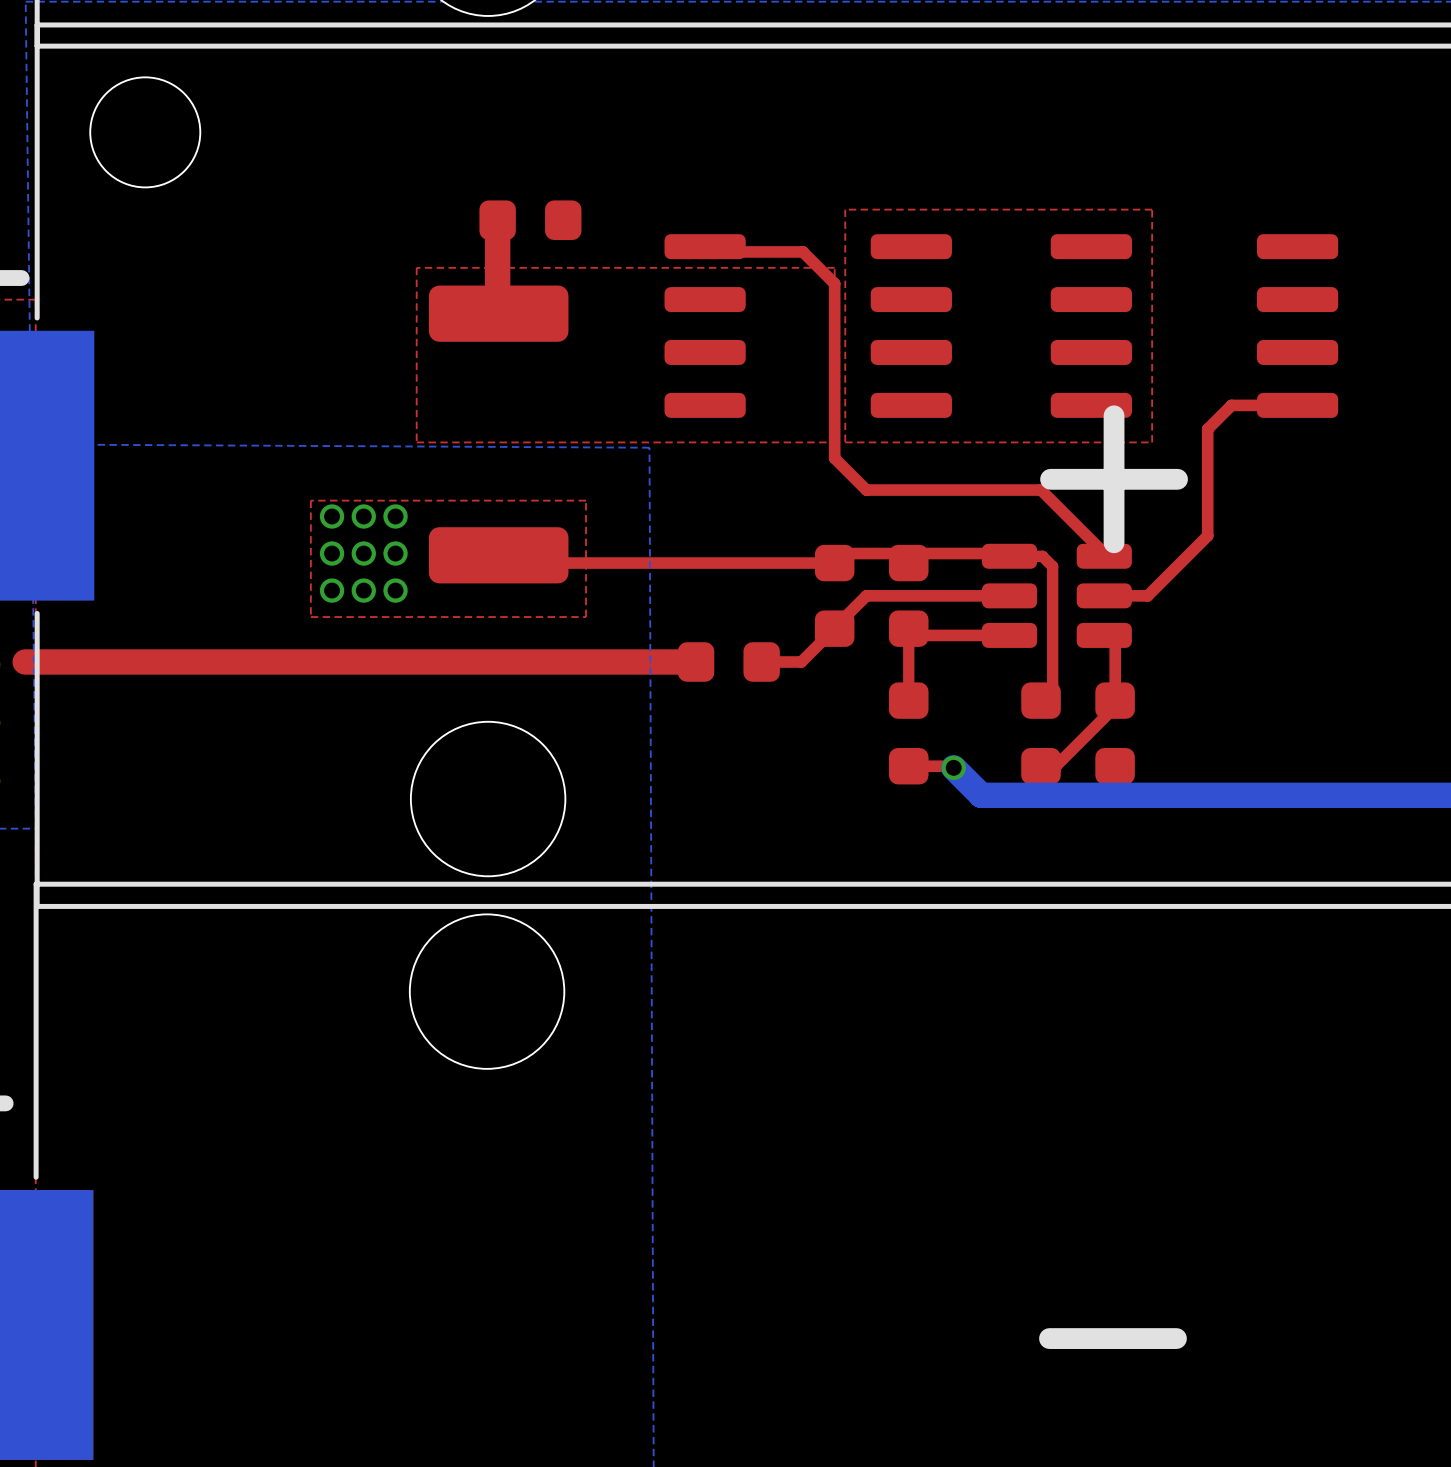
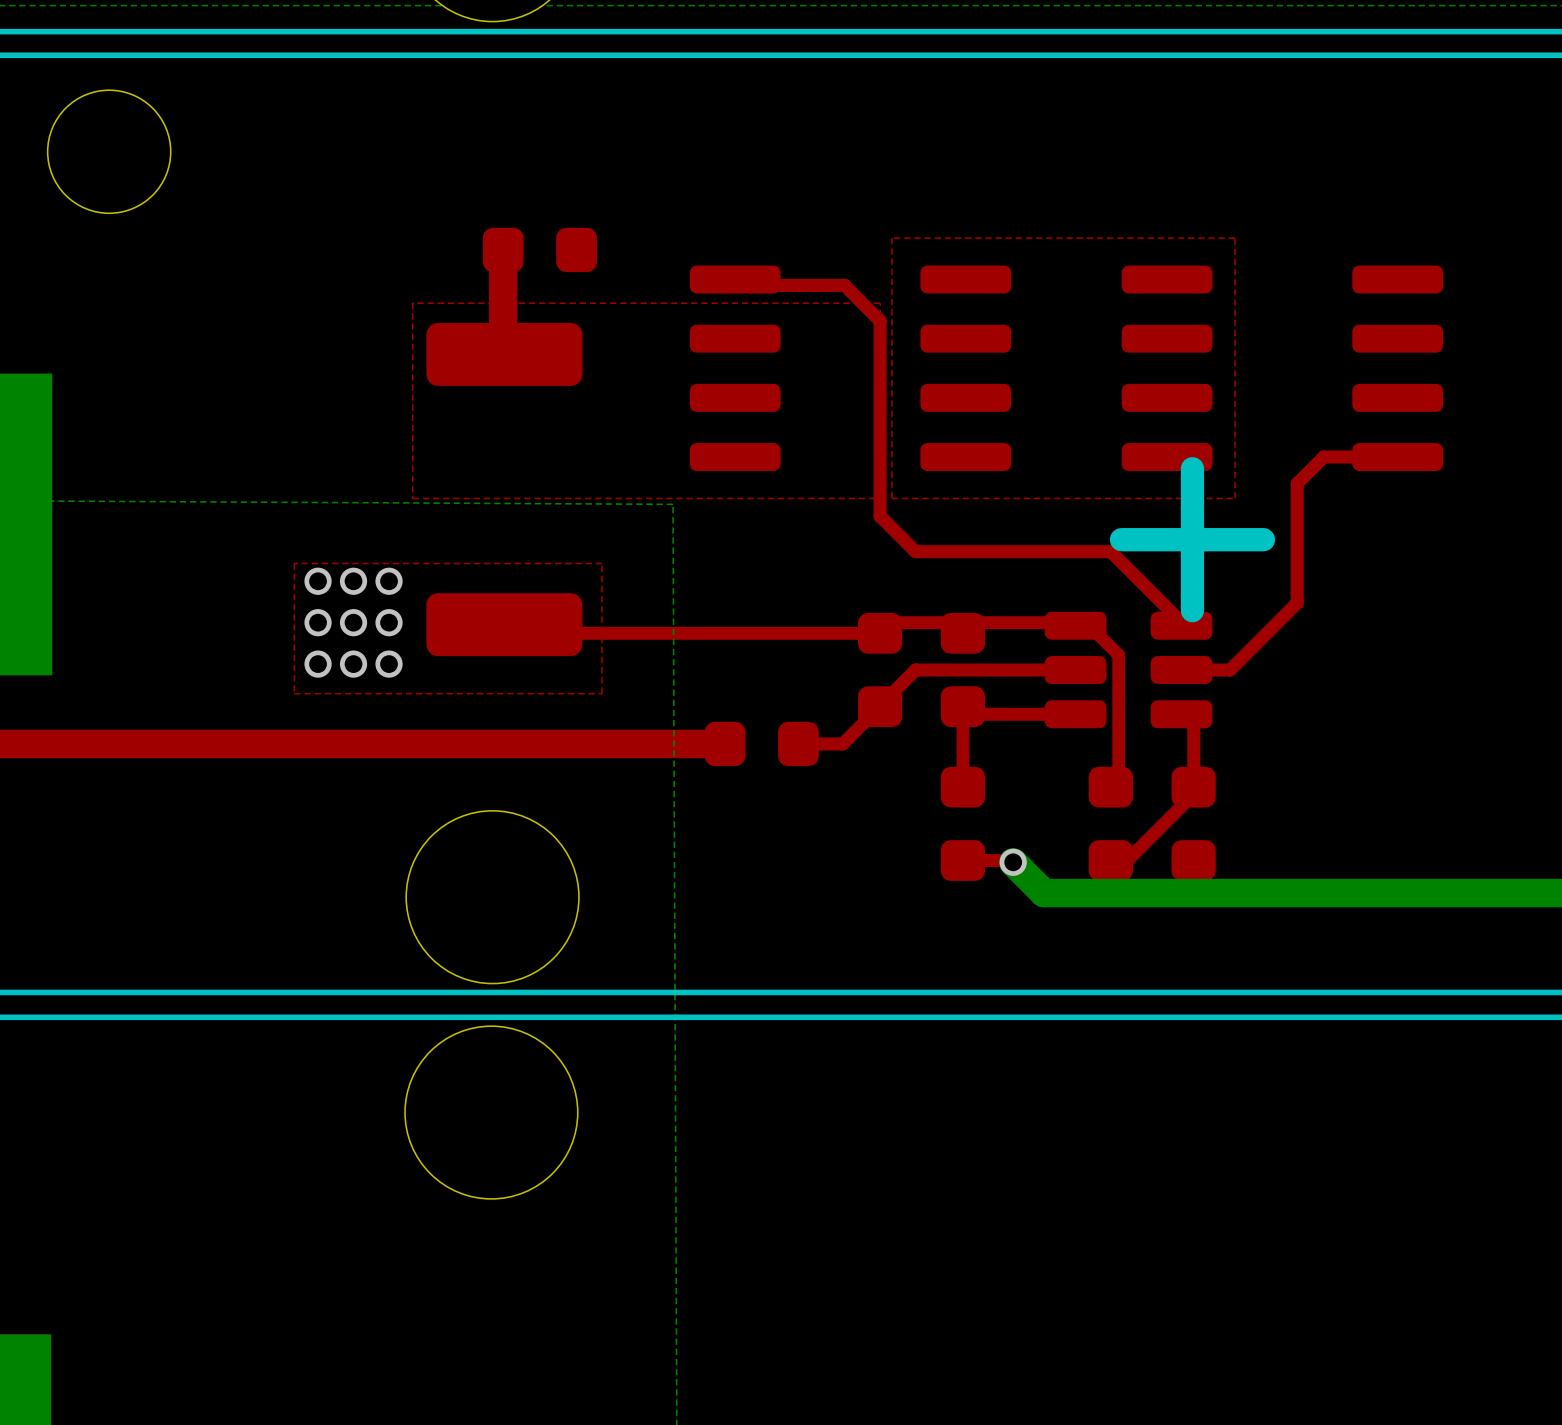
top track: (1021, 556) (1042, 556) (1052, 566) (1052, 688) (1048, 693) -> (1089, 625) (1118, 655) (1118, 779)

